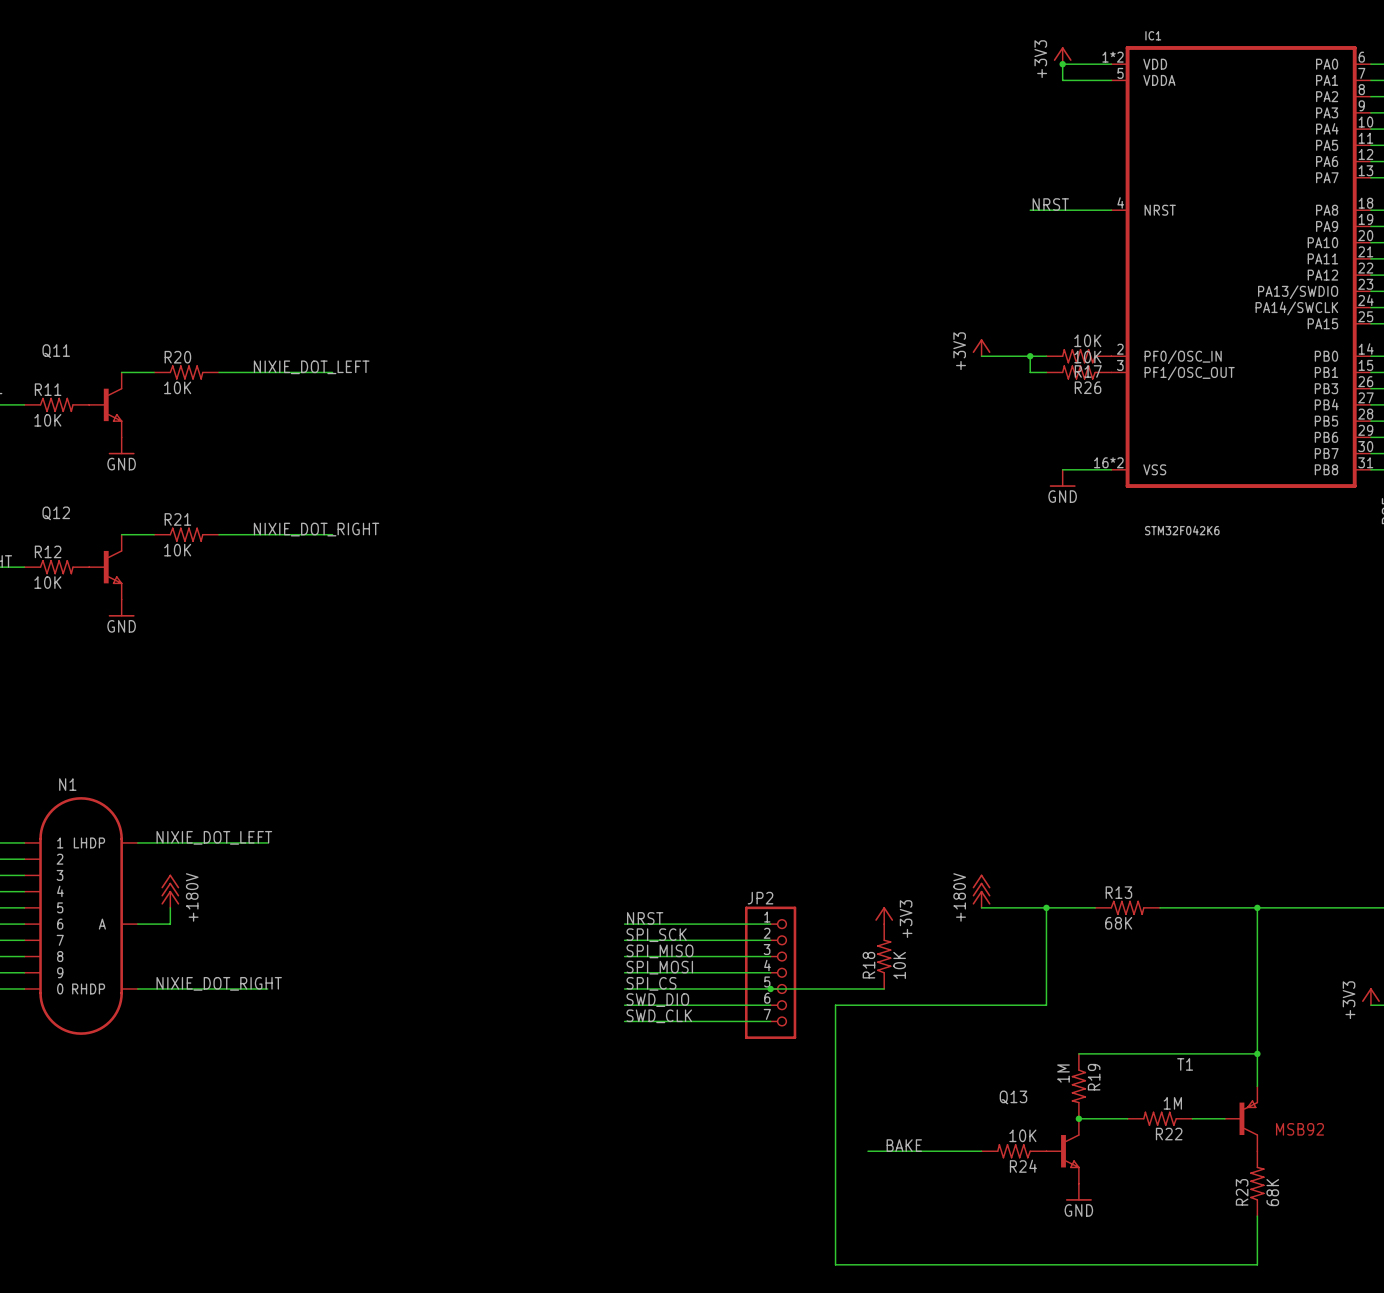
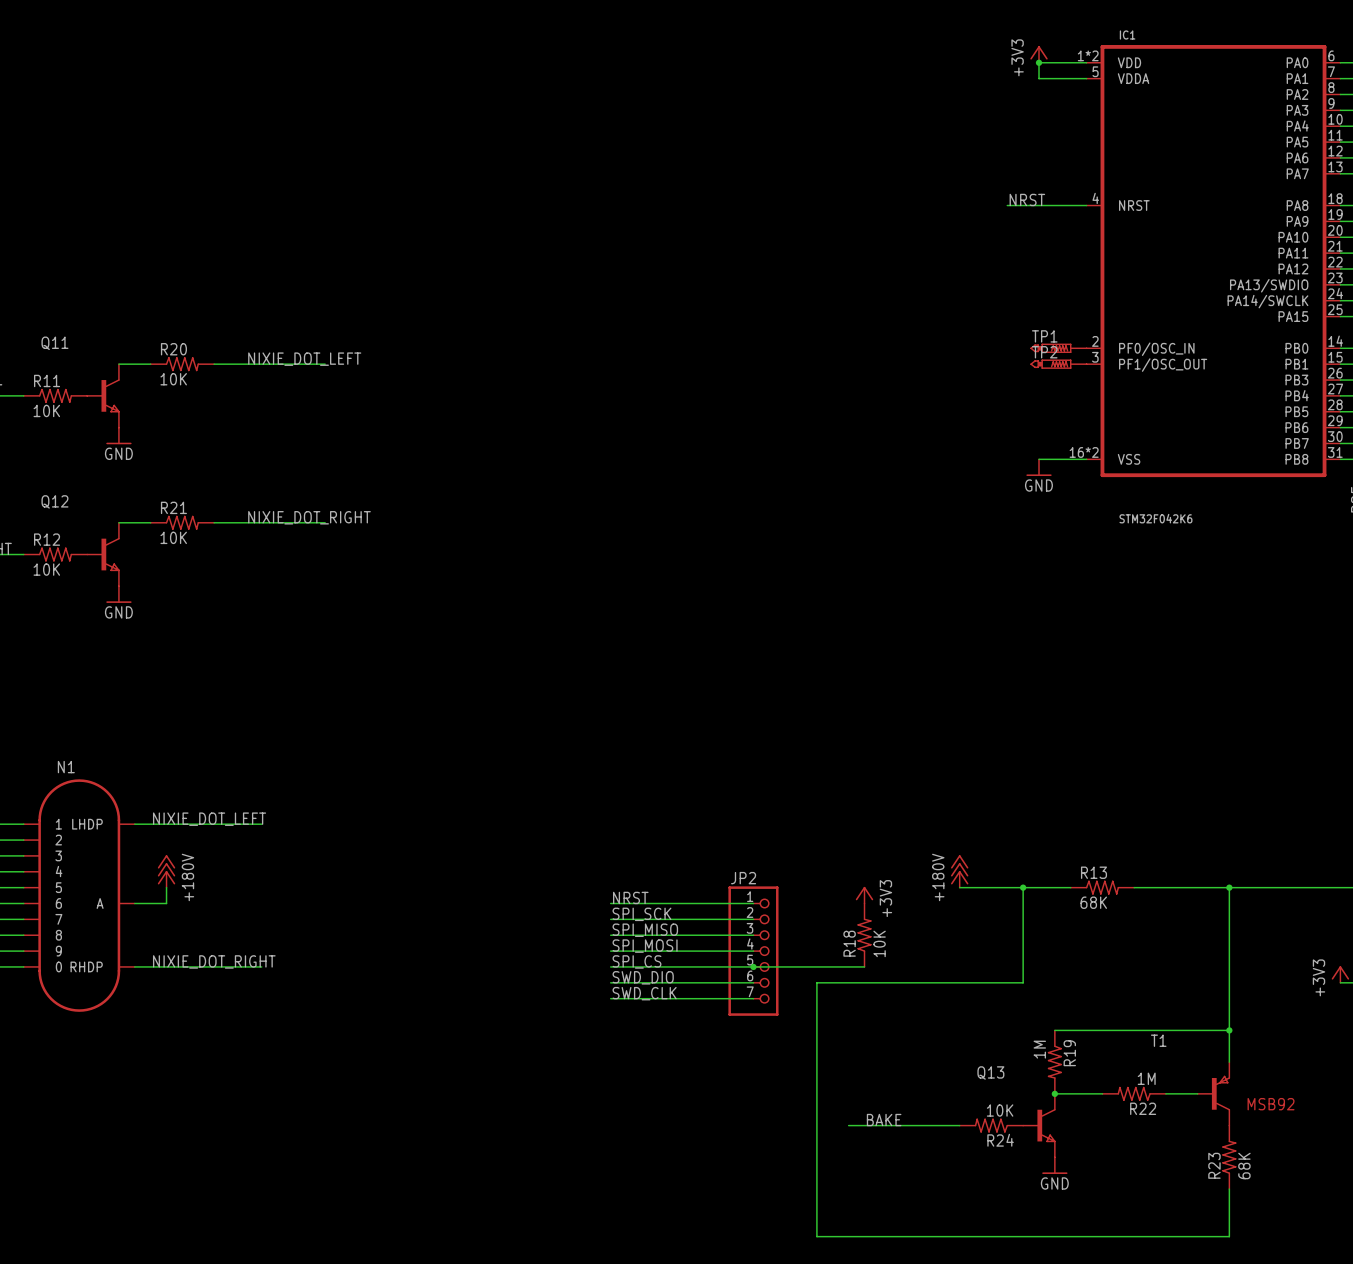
power symbol: +3V3 (981, 347) -> none
wire: (981, 356) (1046, 356) -> none
wire: (1030, 356) (1030, 372) (1046, 372) -> none
junction: (1030, 356) -> none
R17: 10K (1078, 356) -> none
TP1: none -> (1058, 348)
R26: 10K (1078, 372) -> none
TP2: none -> (1058, 364)

